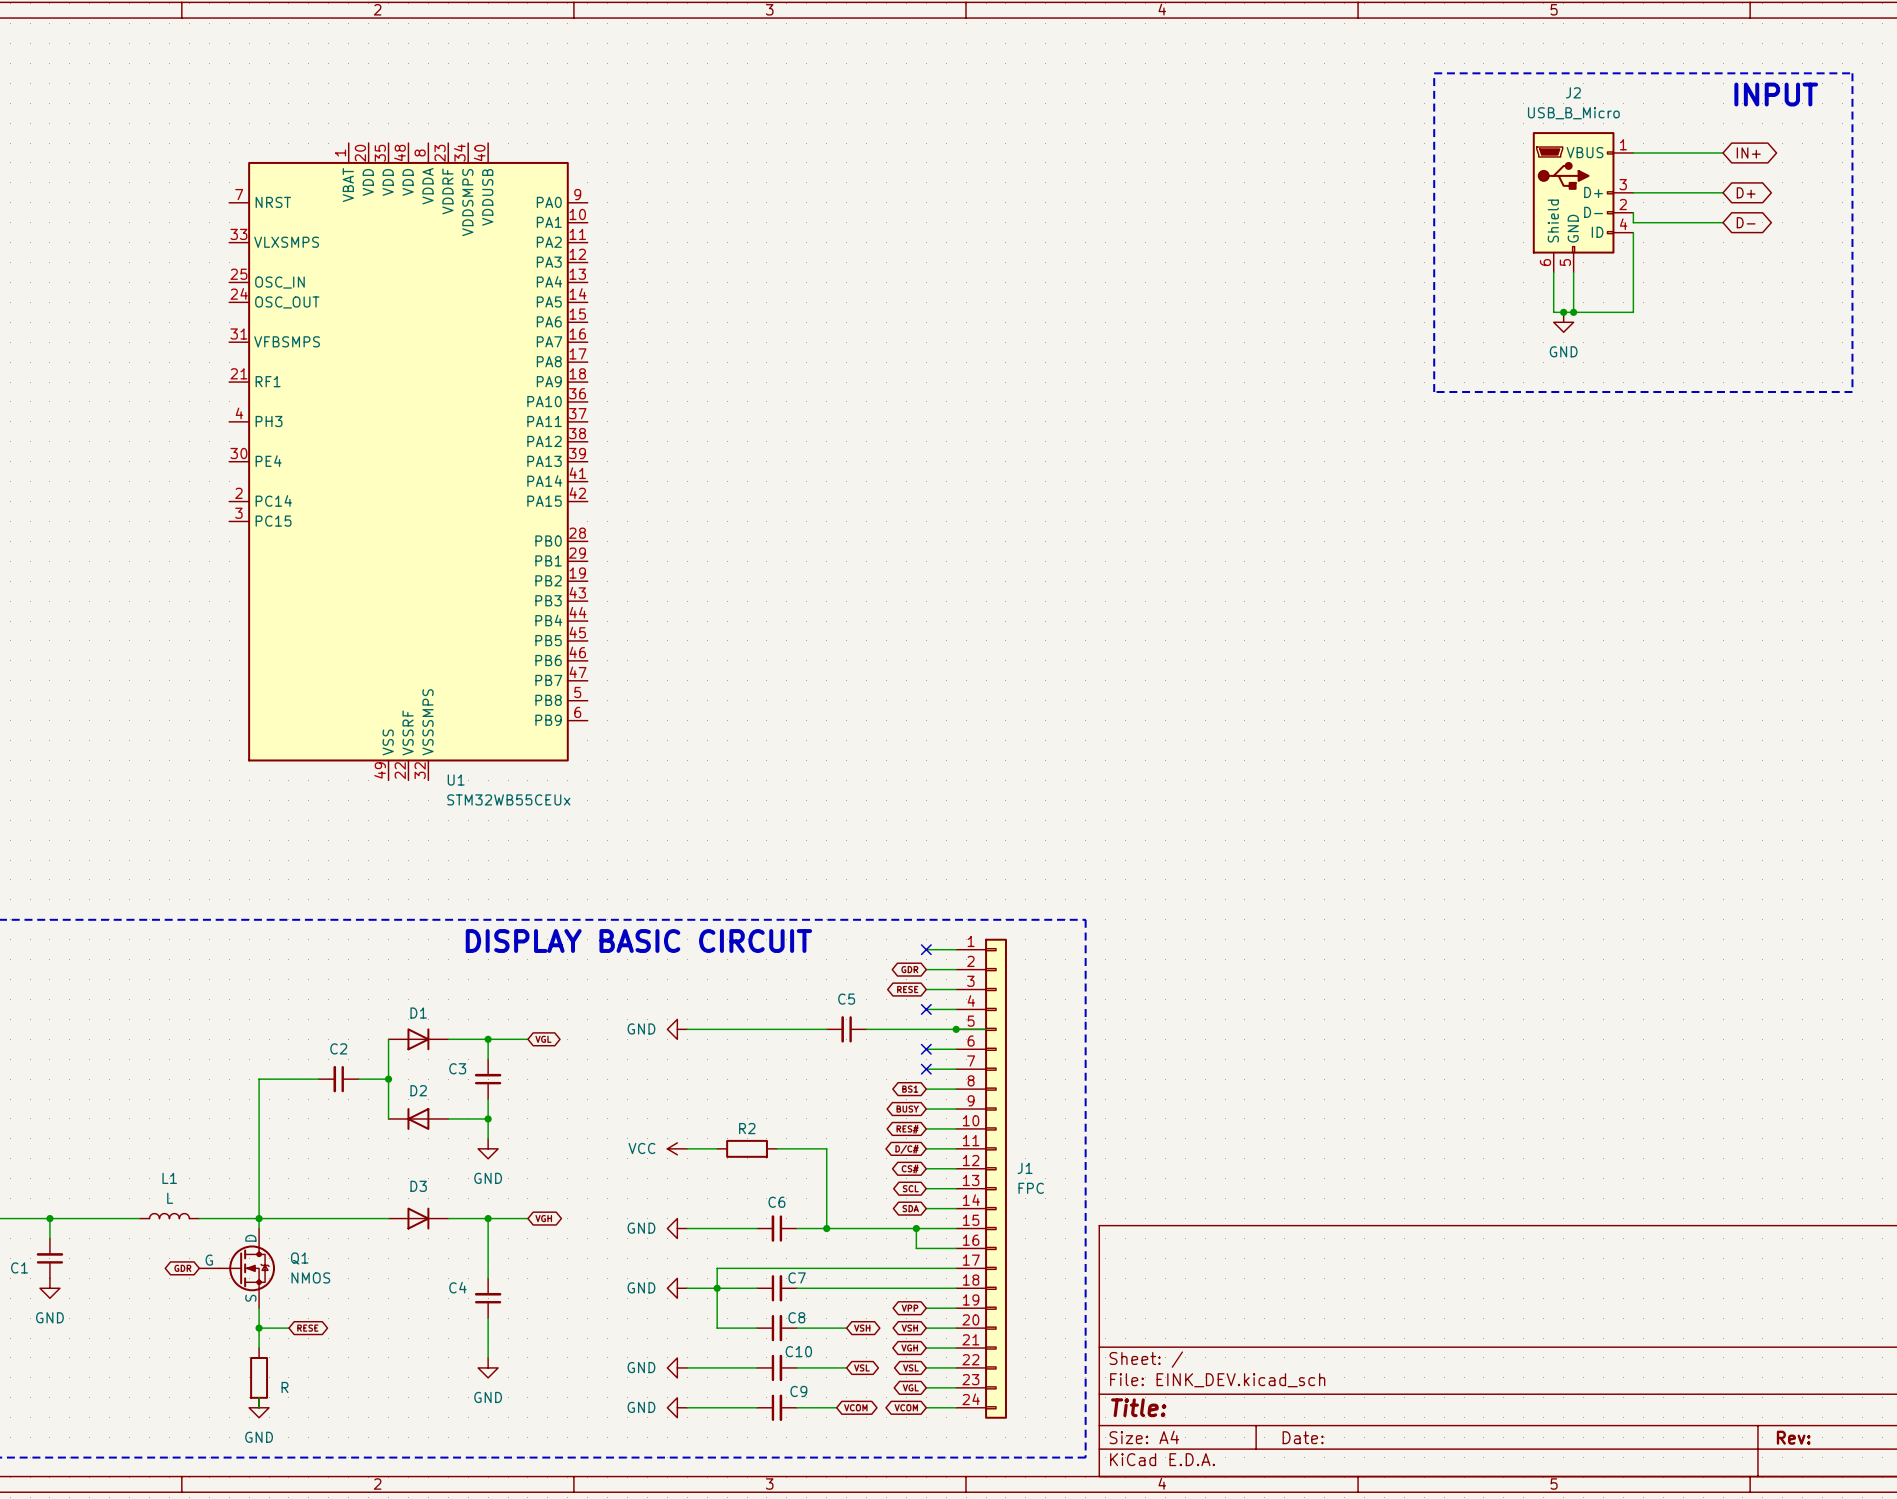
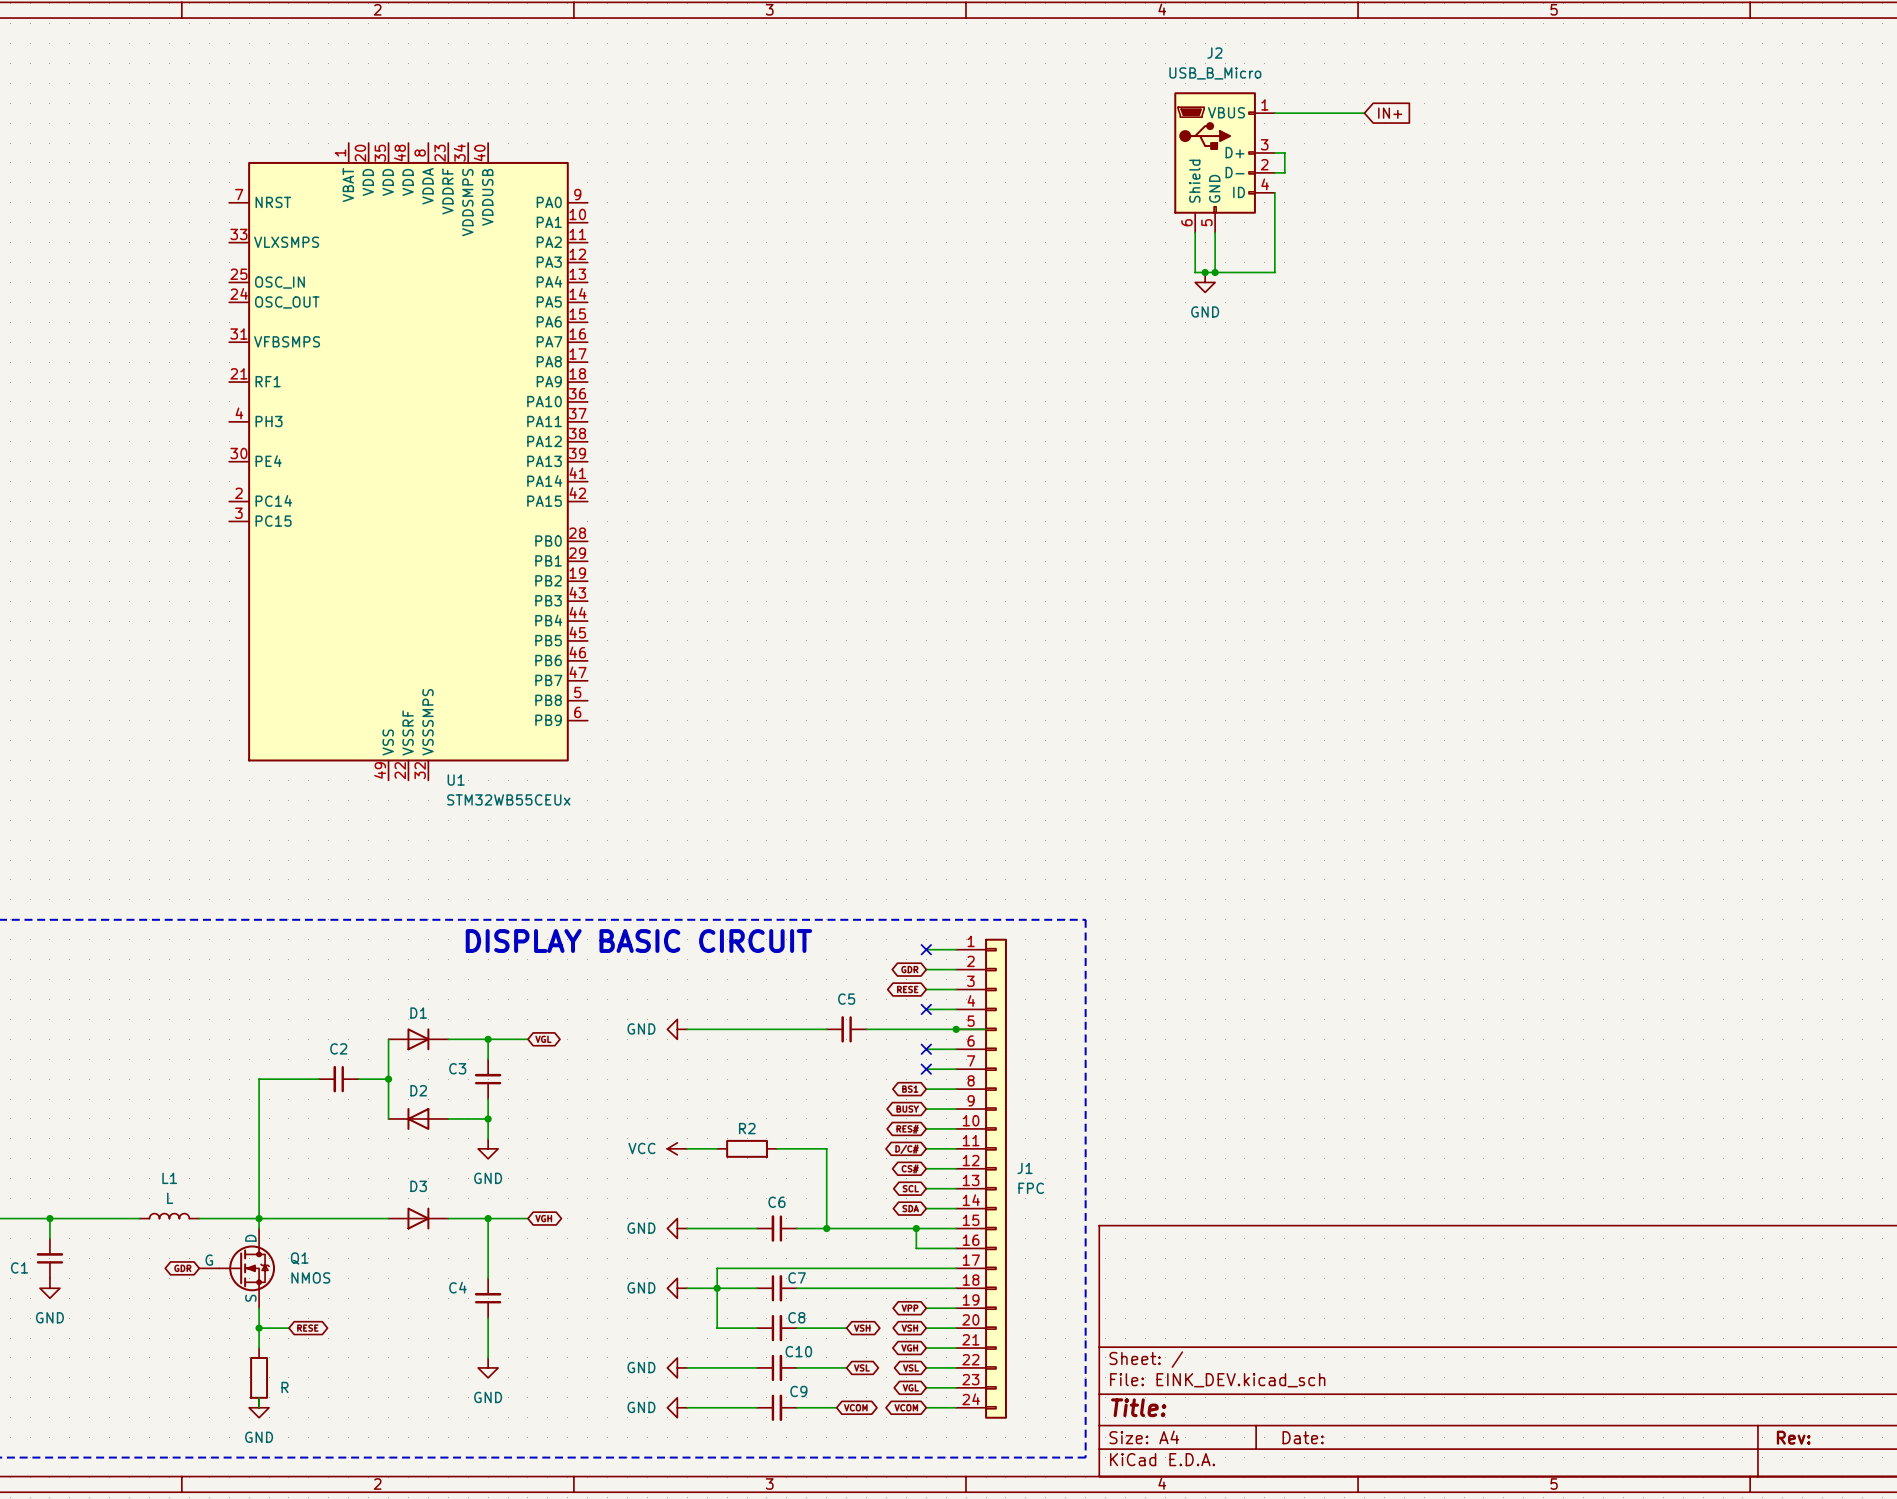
line: (1434, 73) (1852, 73) (1852, 392) (1434, 392) (1434, 73) -> none
text: INPUT (1776, 94) -> none
wire: none -> (1274, 113) (1364, 113)
global label: none -> IN+ (1390, 113)
wire: none -> (1274, 152) (1284, 152) (1284, 172) (1274, 172)
wire: (1633, 152) (1723, 152) -> none
global label: IN+ (1748, 152) -> none
wire: none -> (1274, 192) (1274, 272) (1195, 272) (1195, 232)
wire: (1633, 192) (1723, 192) -> none
global label: D+ (1746, 192) -> none
J2 position: (1583, 202) -> (1224, 162)
wire: (1633, 212) (1633, 222) (1723, 222) -> none
global label: D- (1746, 222) -> none
wire: none -> (1215, 232) (1215, 272)
wire: (1633, 232) (1633, 312) (1553, 312) (1553, 272) -> none
junction: none -> (1205, 272)
junction: none -> (1215, 272)
wire: (1573, 272) (1573, 312) -> none
power symbol: none -> GND (1205, 282)
junction: (1563, 312) -> none
junction: (1573, 312) -> none
power symbol: GND (1563, 322) -> none

